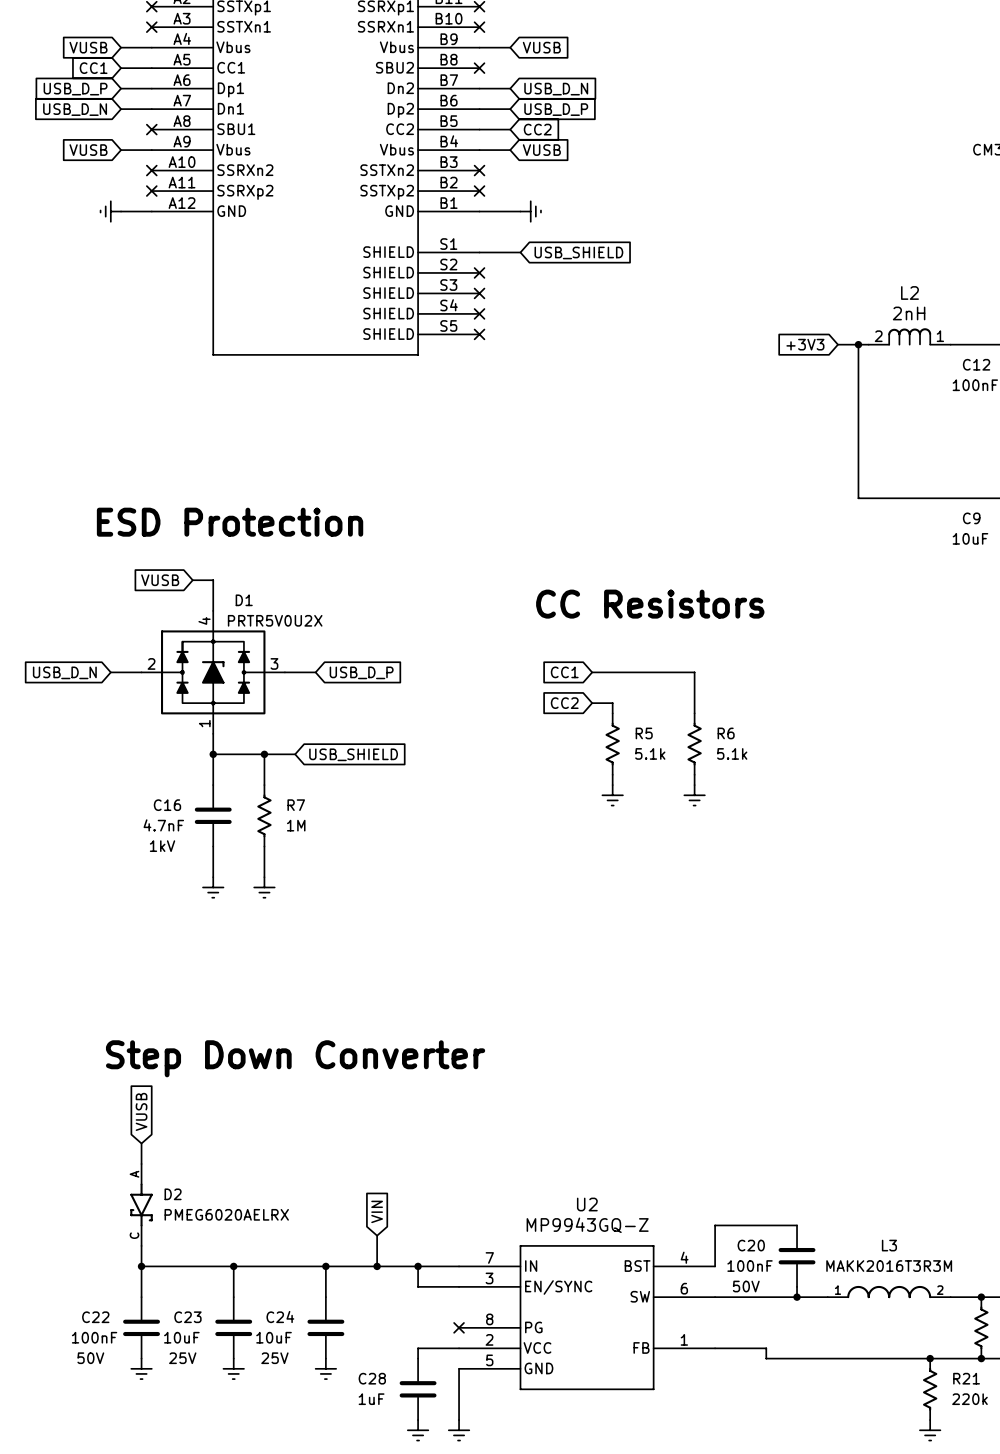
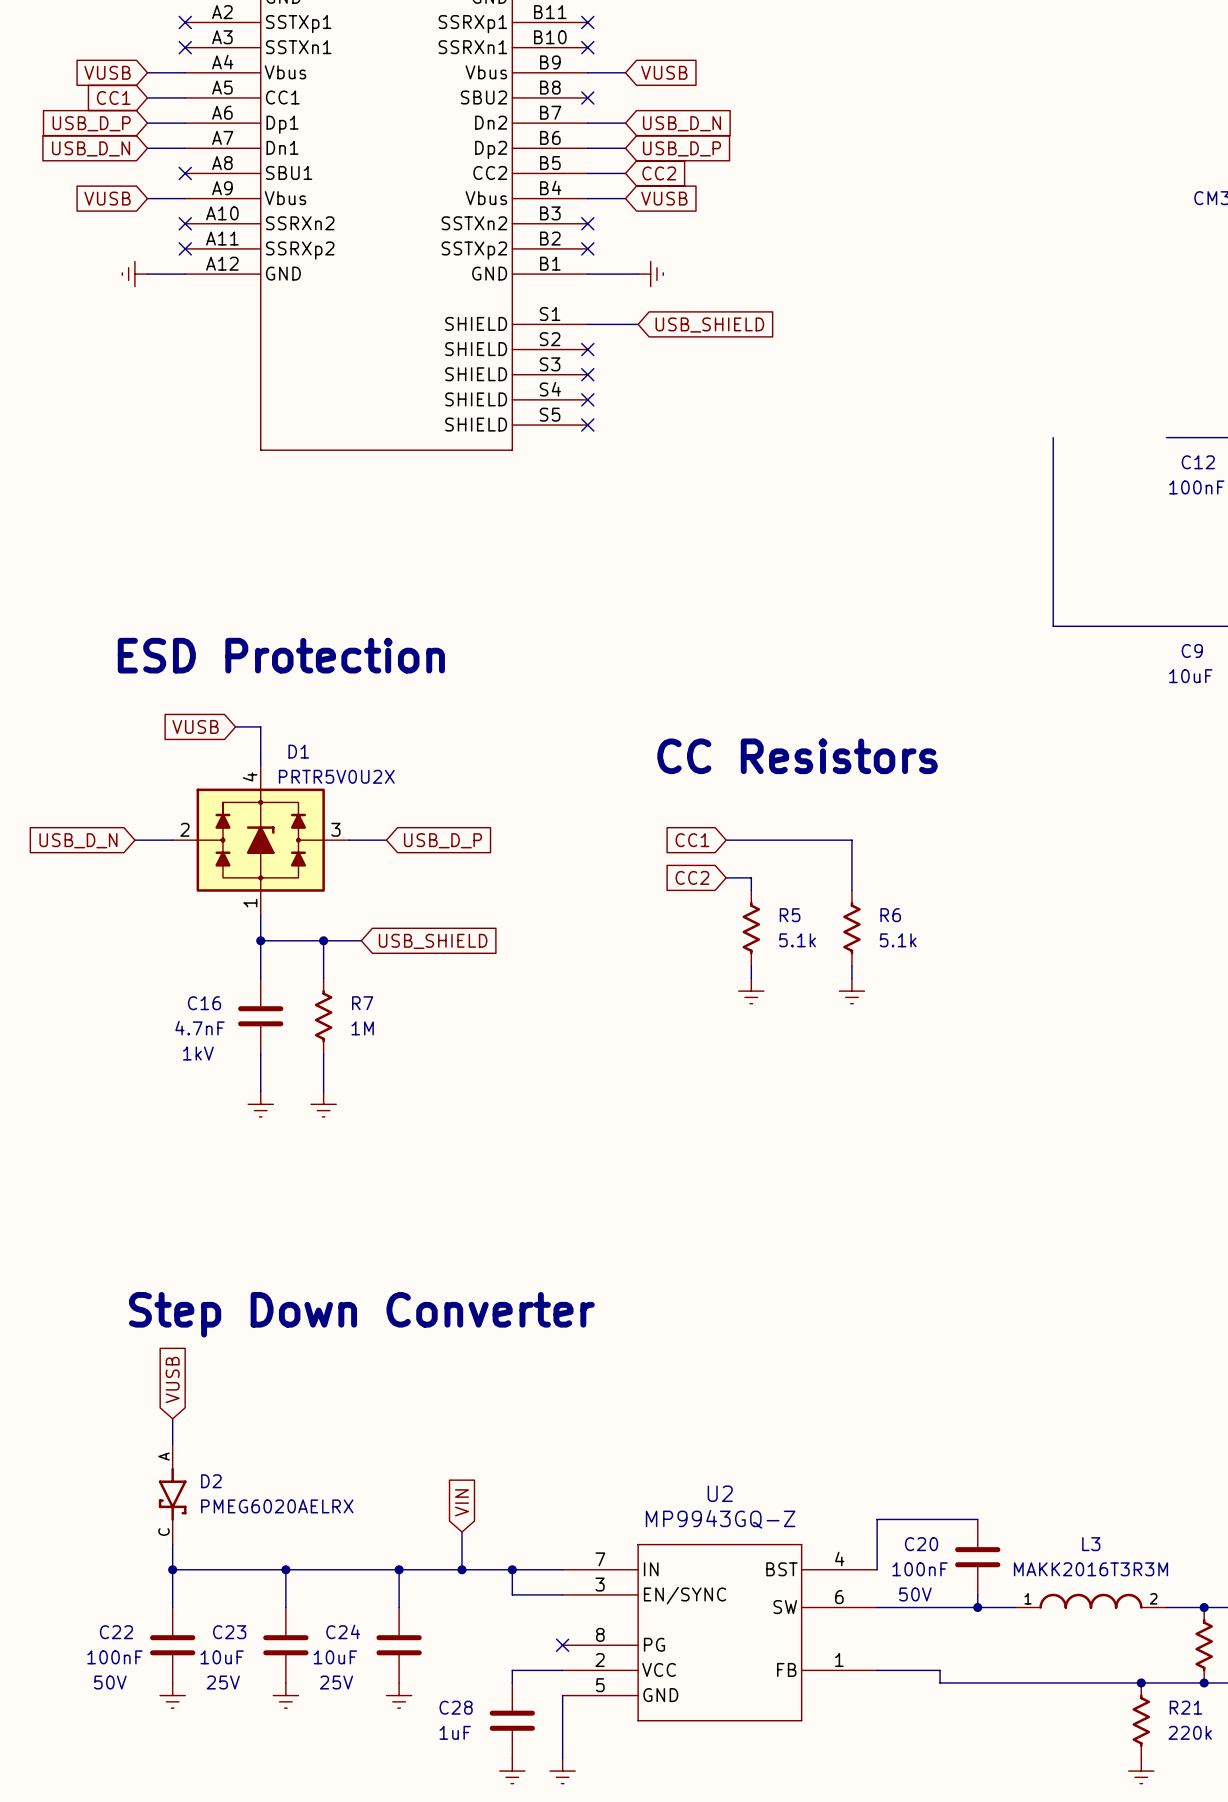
L2: 2nH (909, 336) -> none
global label: +3V3 (805, 344) -> none
wire: (837, 344) (868, 344) -> none
junction: (858, 344) -> none

